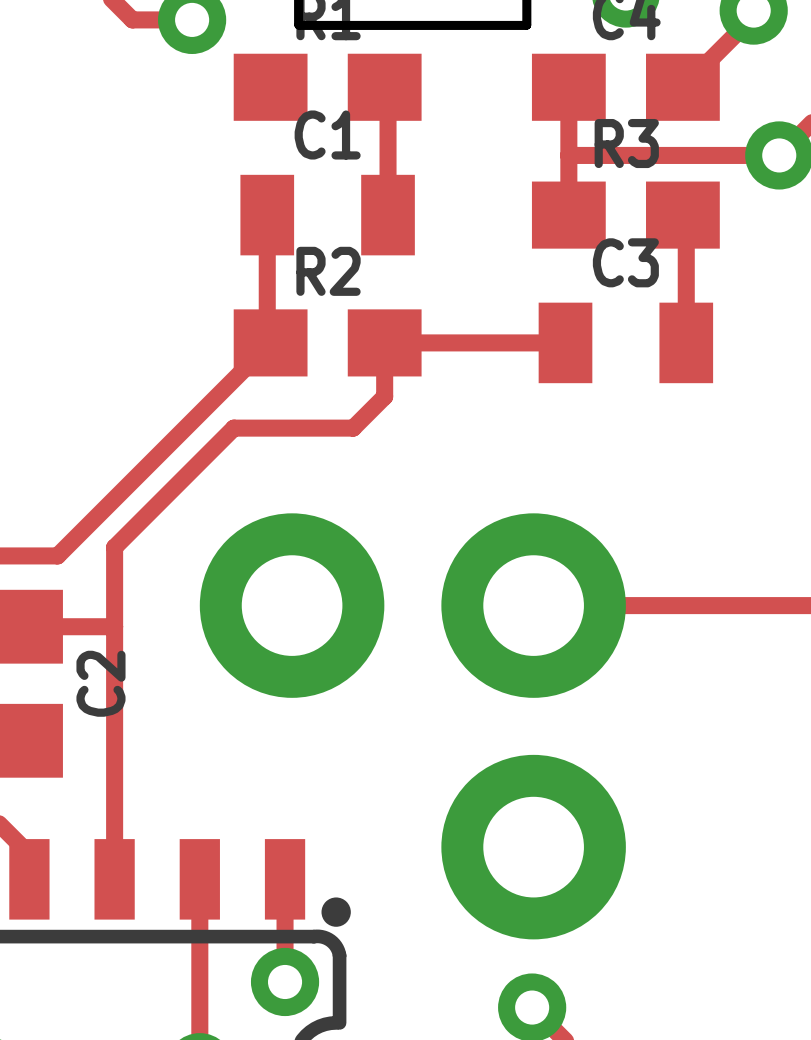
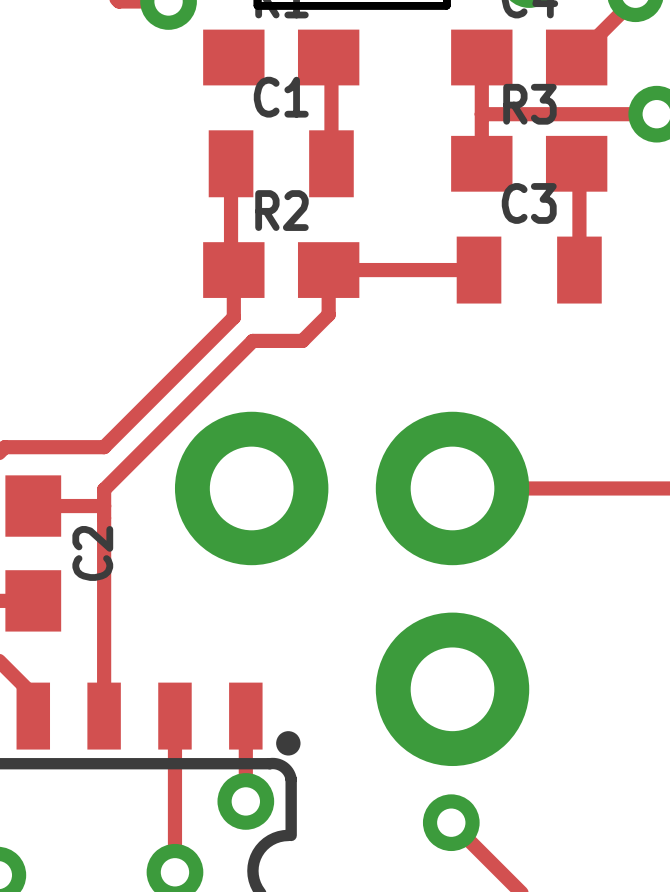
track: (270, 342) (57, 555) -> (233, 270) (233, 317) (104, 447) (56, 447)
track: (293, 428) (233, 428) (114, 547) (114, 607) -> (252, 340) (104, 489)

